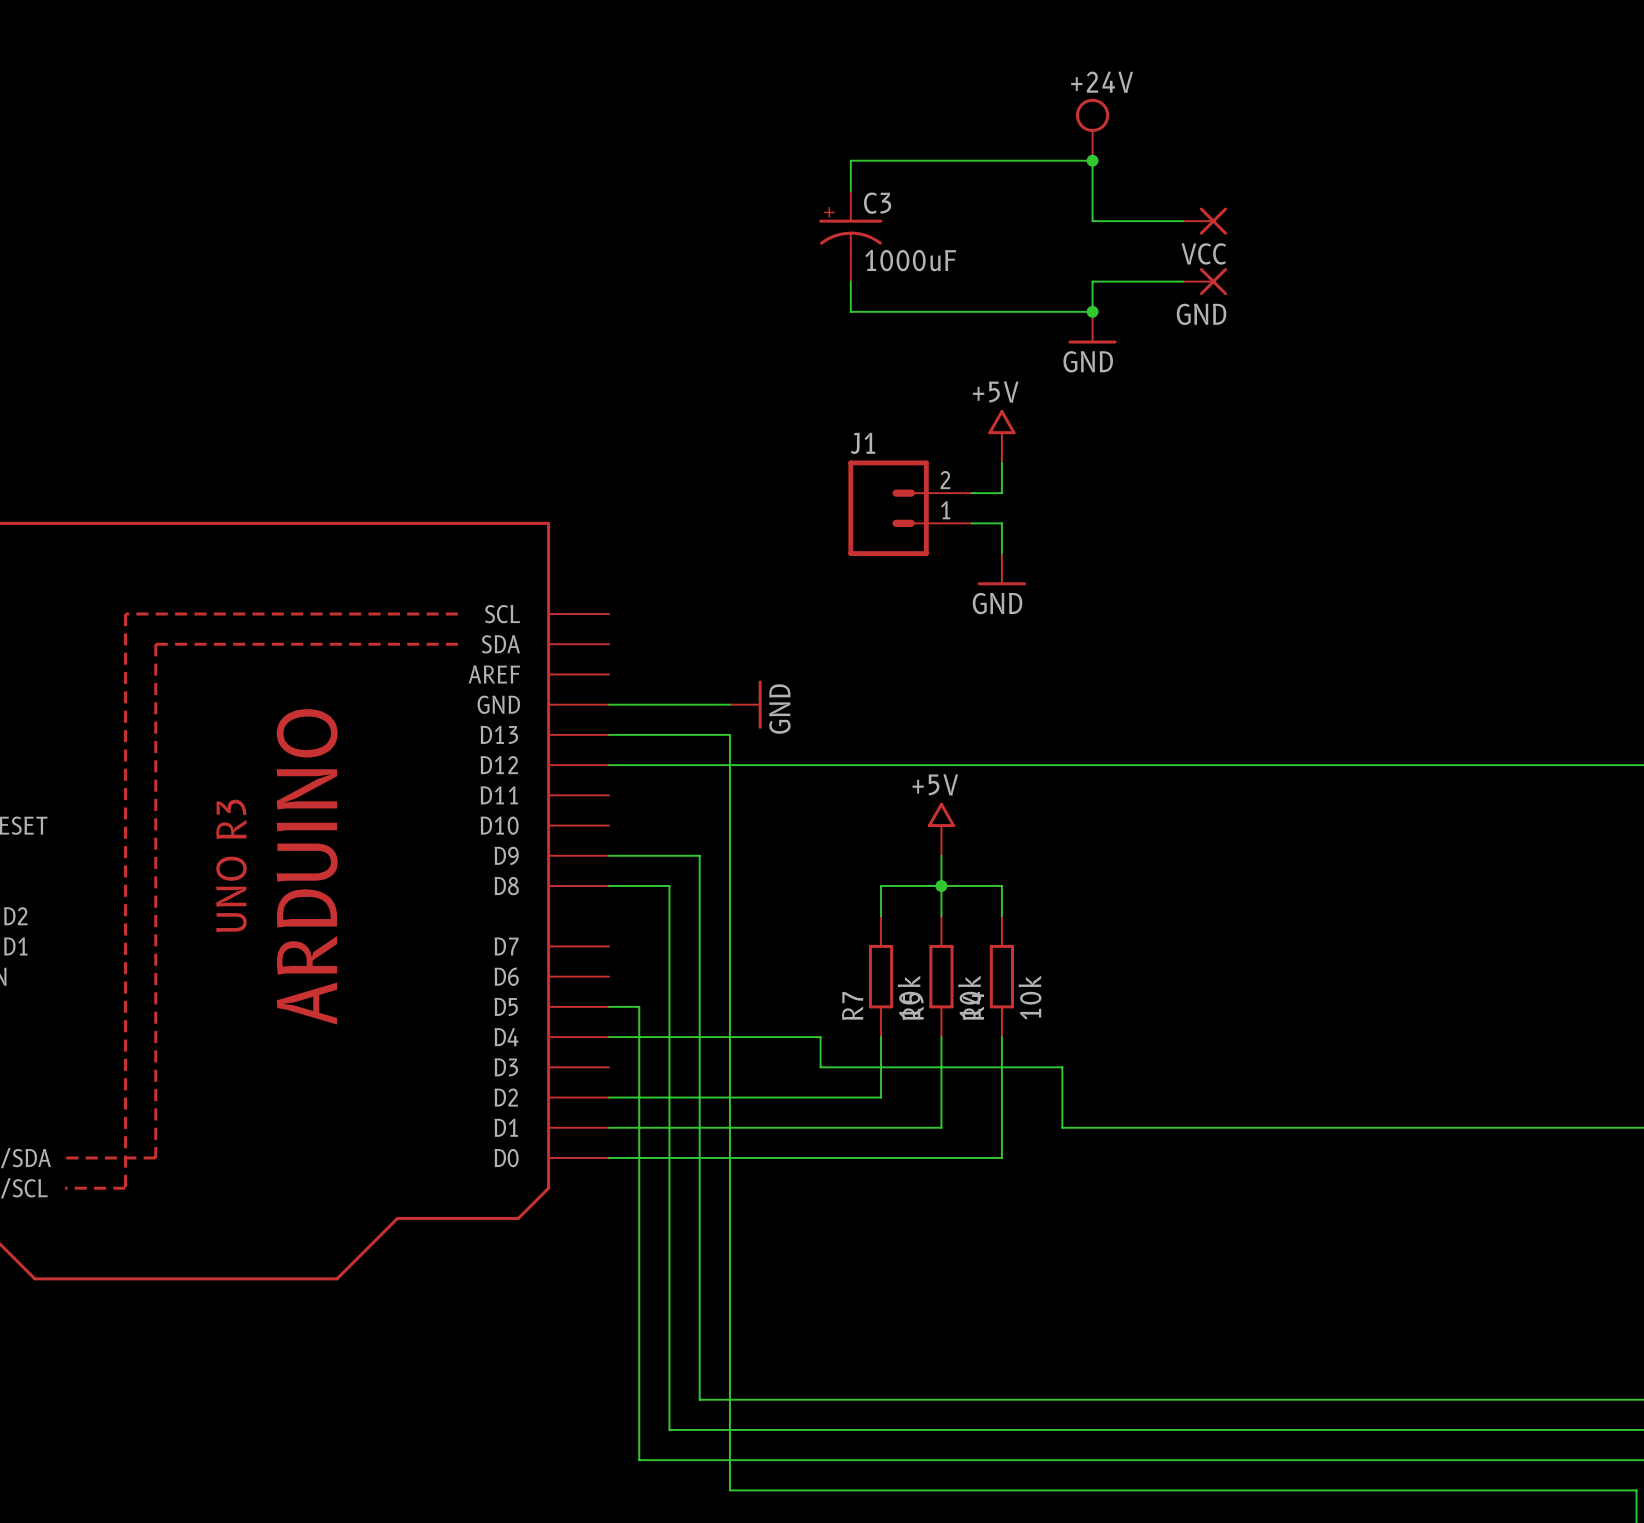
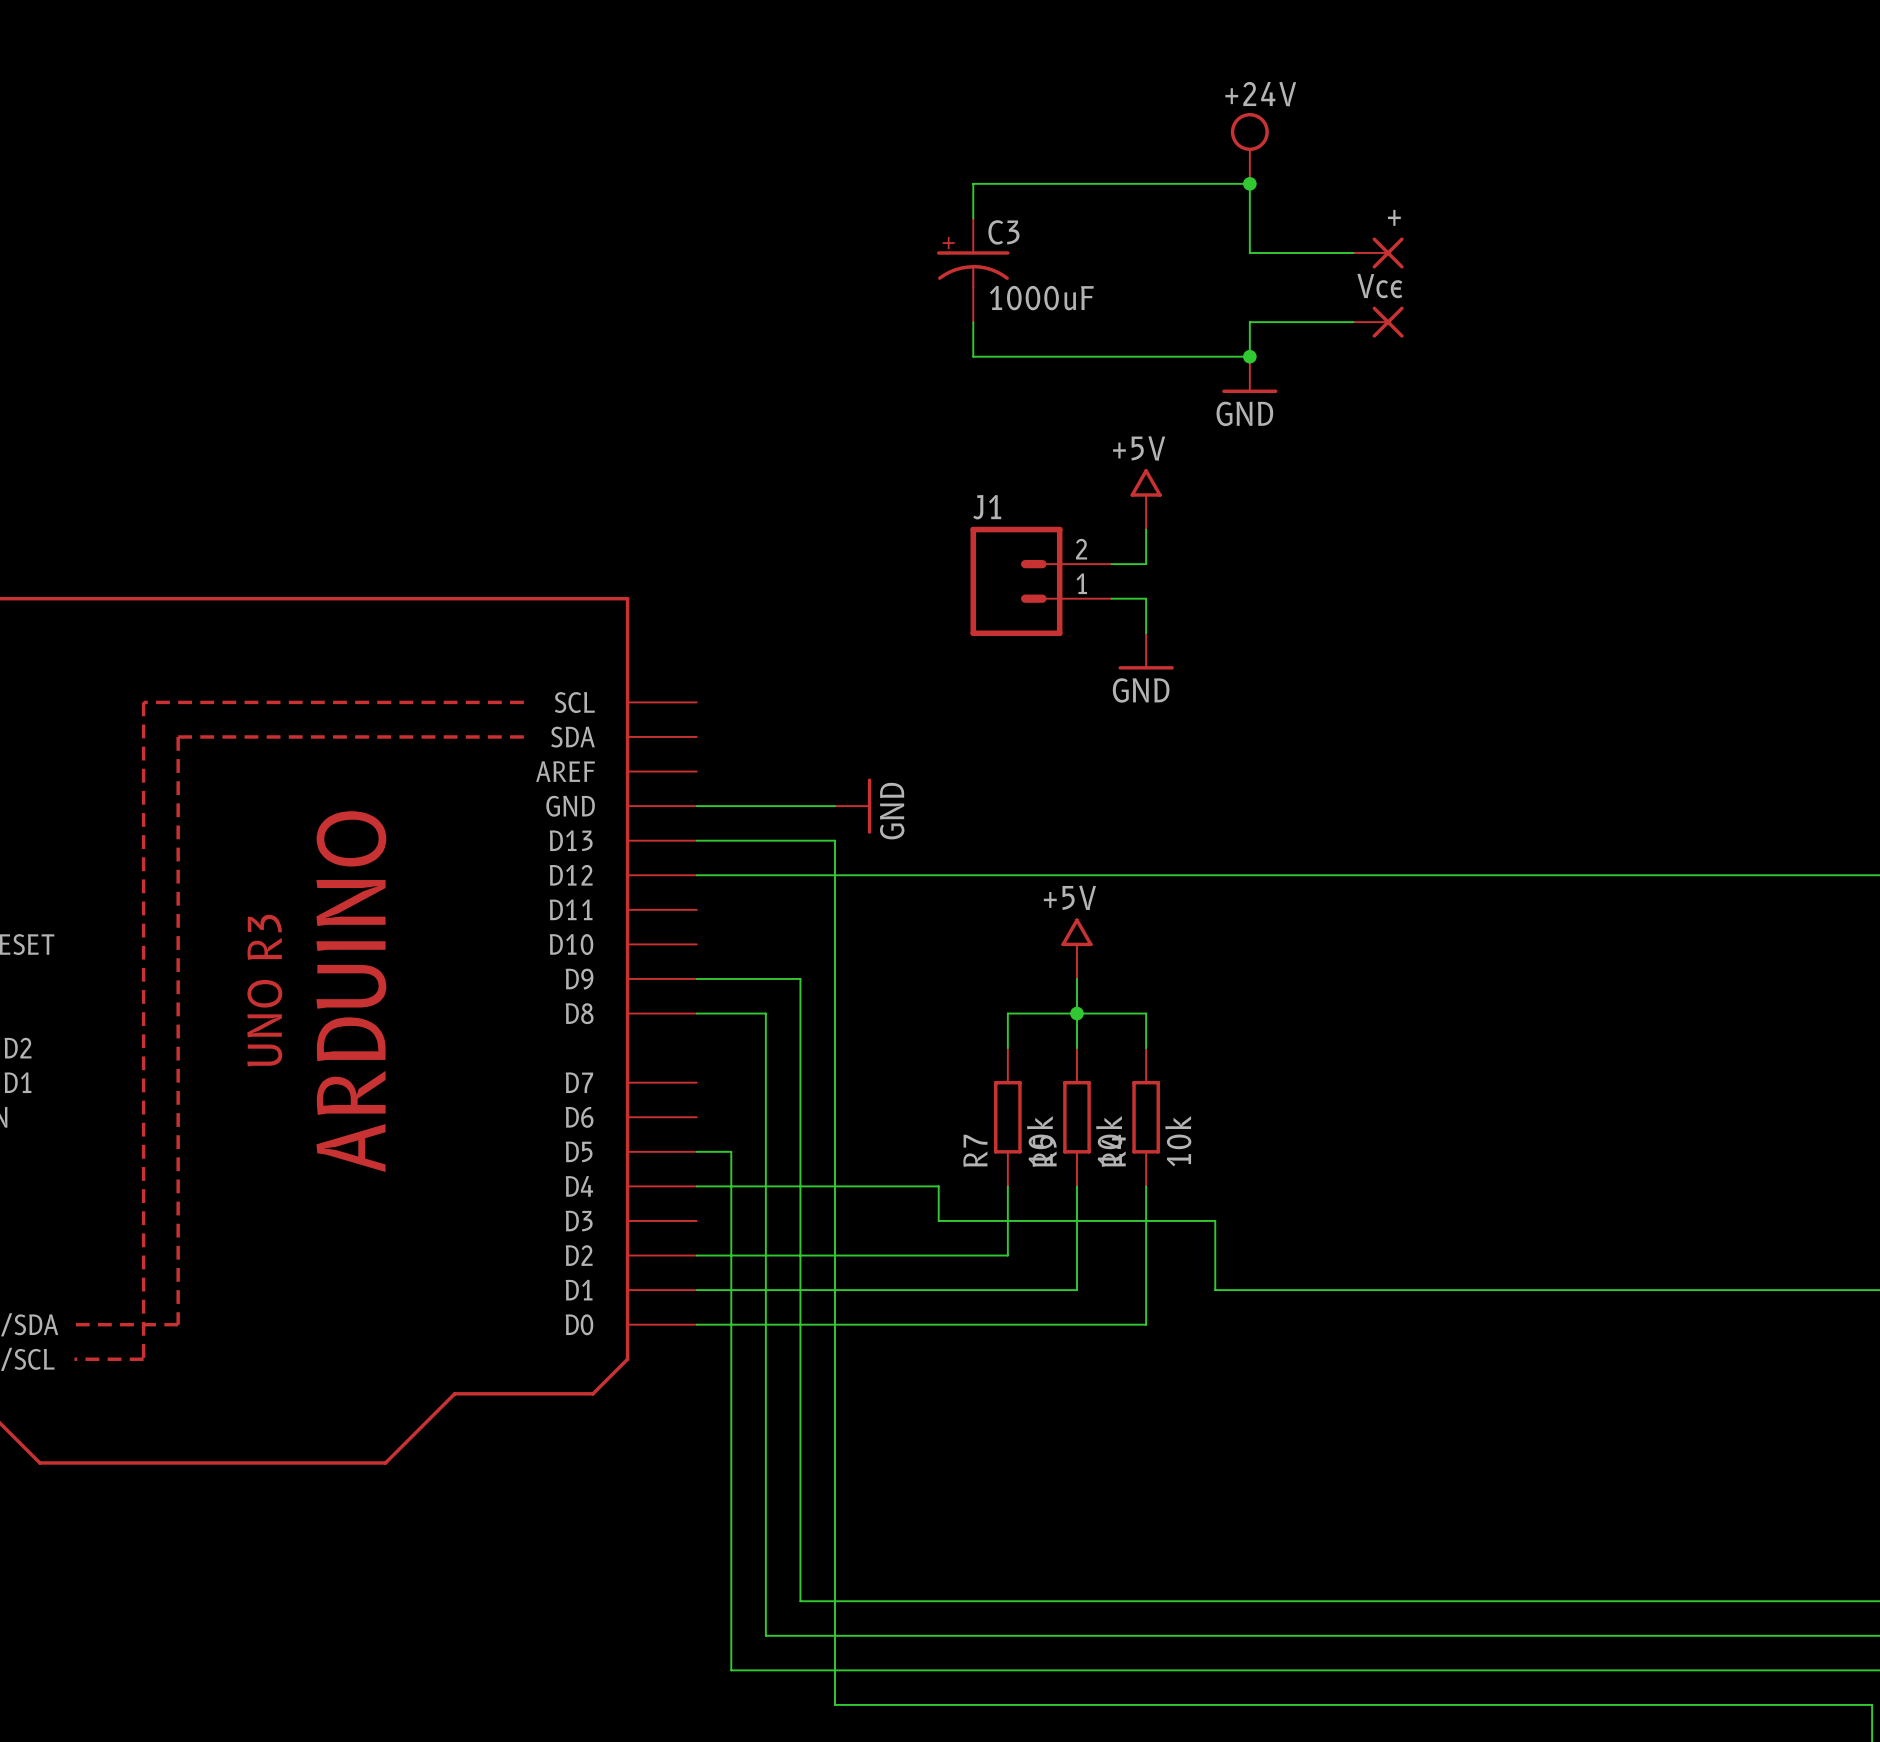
VCC value: none -> Vcc (1379, 285)
VCC name: VCC (1203, 253) -> + (1394, 217)
GND name: GND (1201, 314) -> - (1397, 288)

